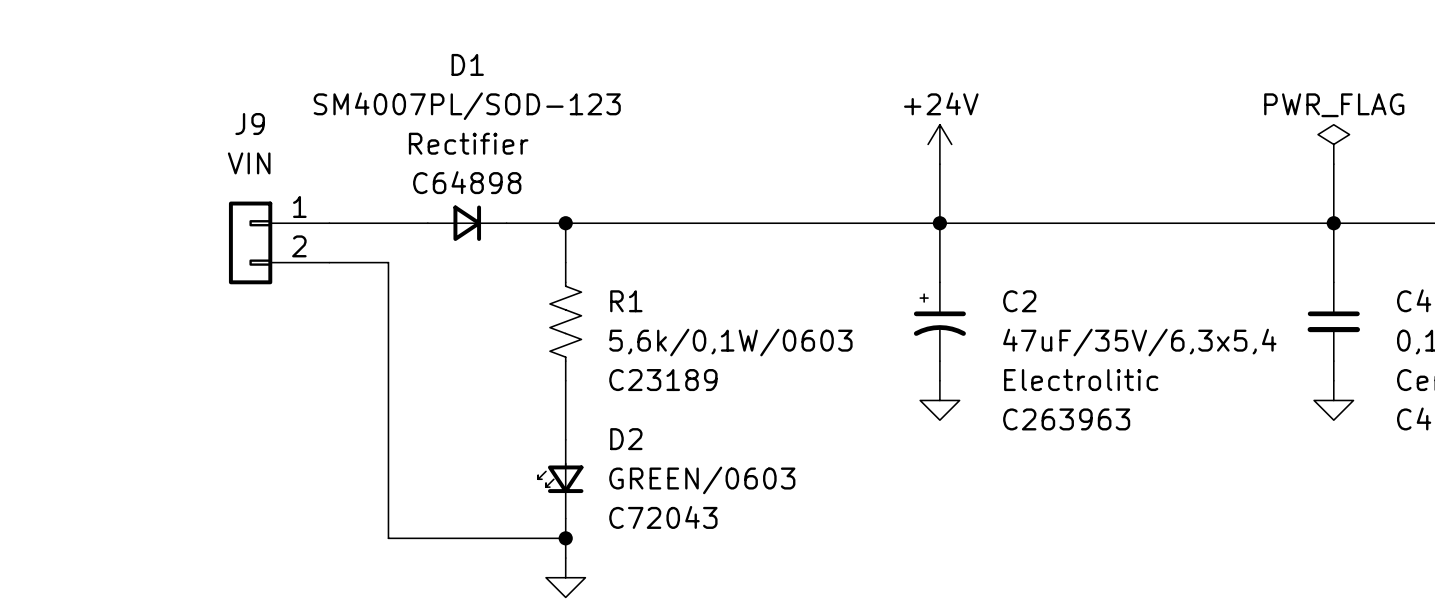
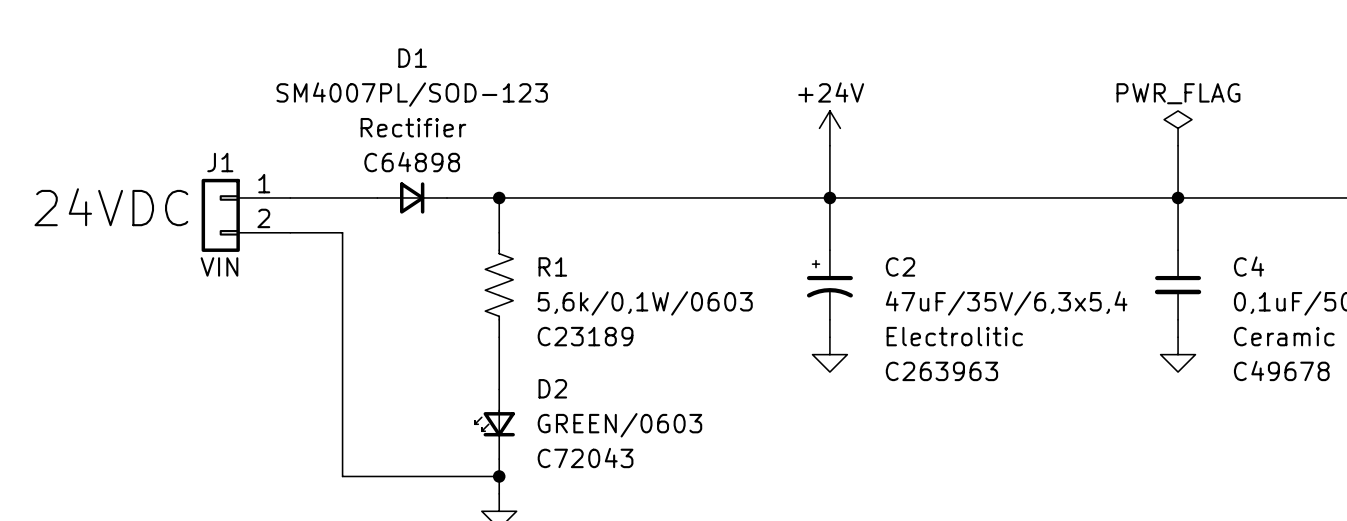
J9 name: J9 (250, 124) -> J1 (220, 162)
J9 value position: VIN (249, 163) -> VIN (219, 266)
text: none -> 24VDC (111, 207)

